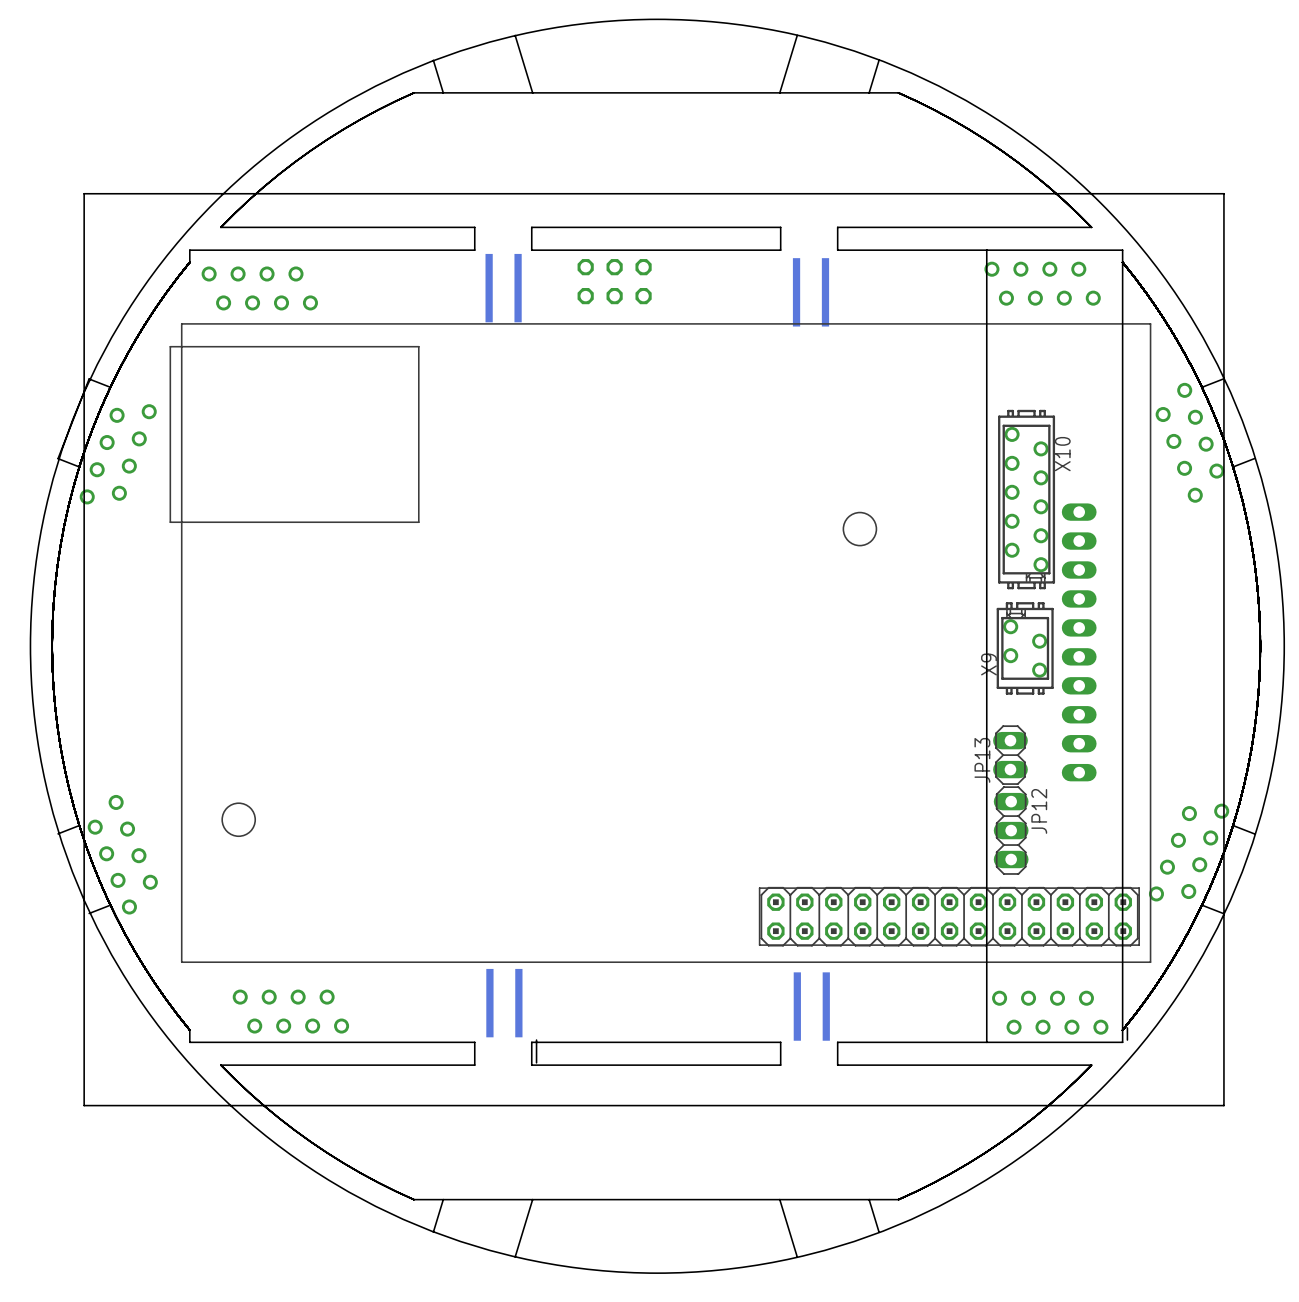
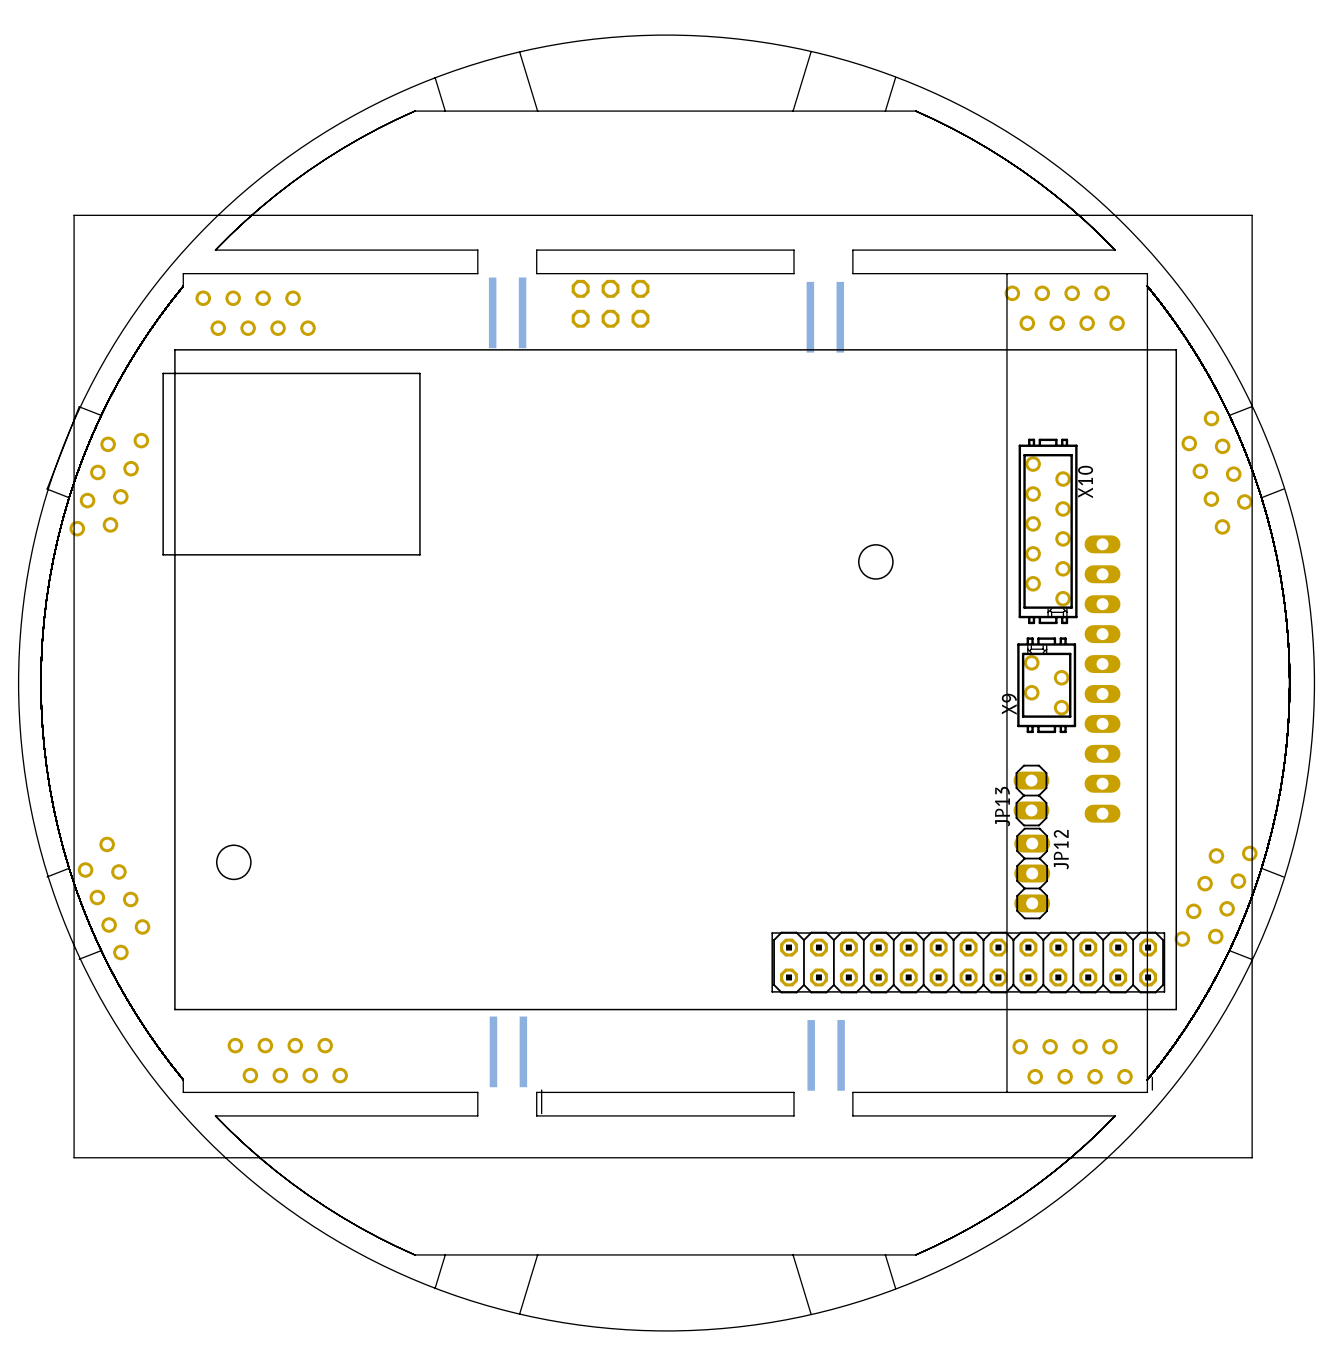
part: none -> (610, 303)
part: (614, 281) -> none

